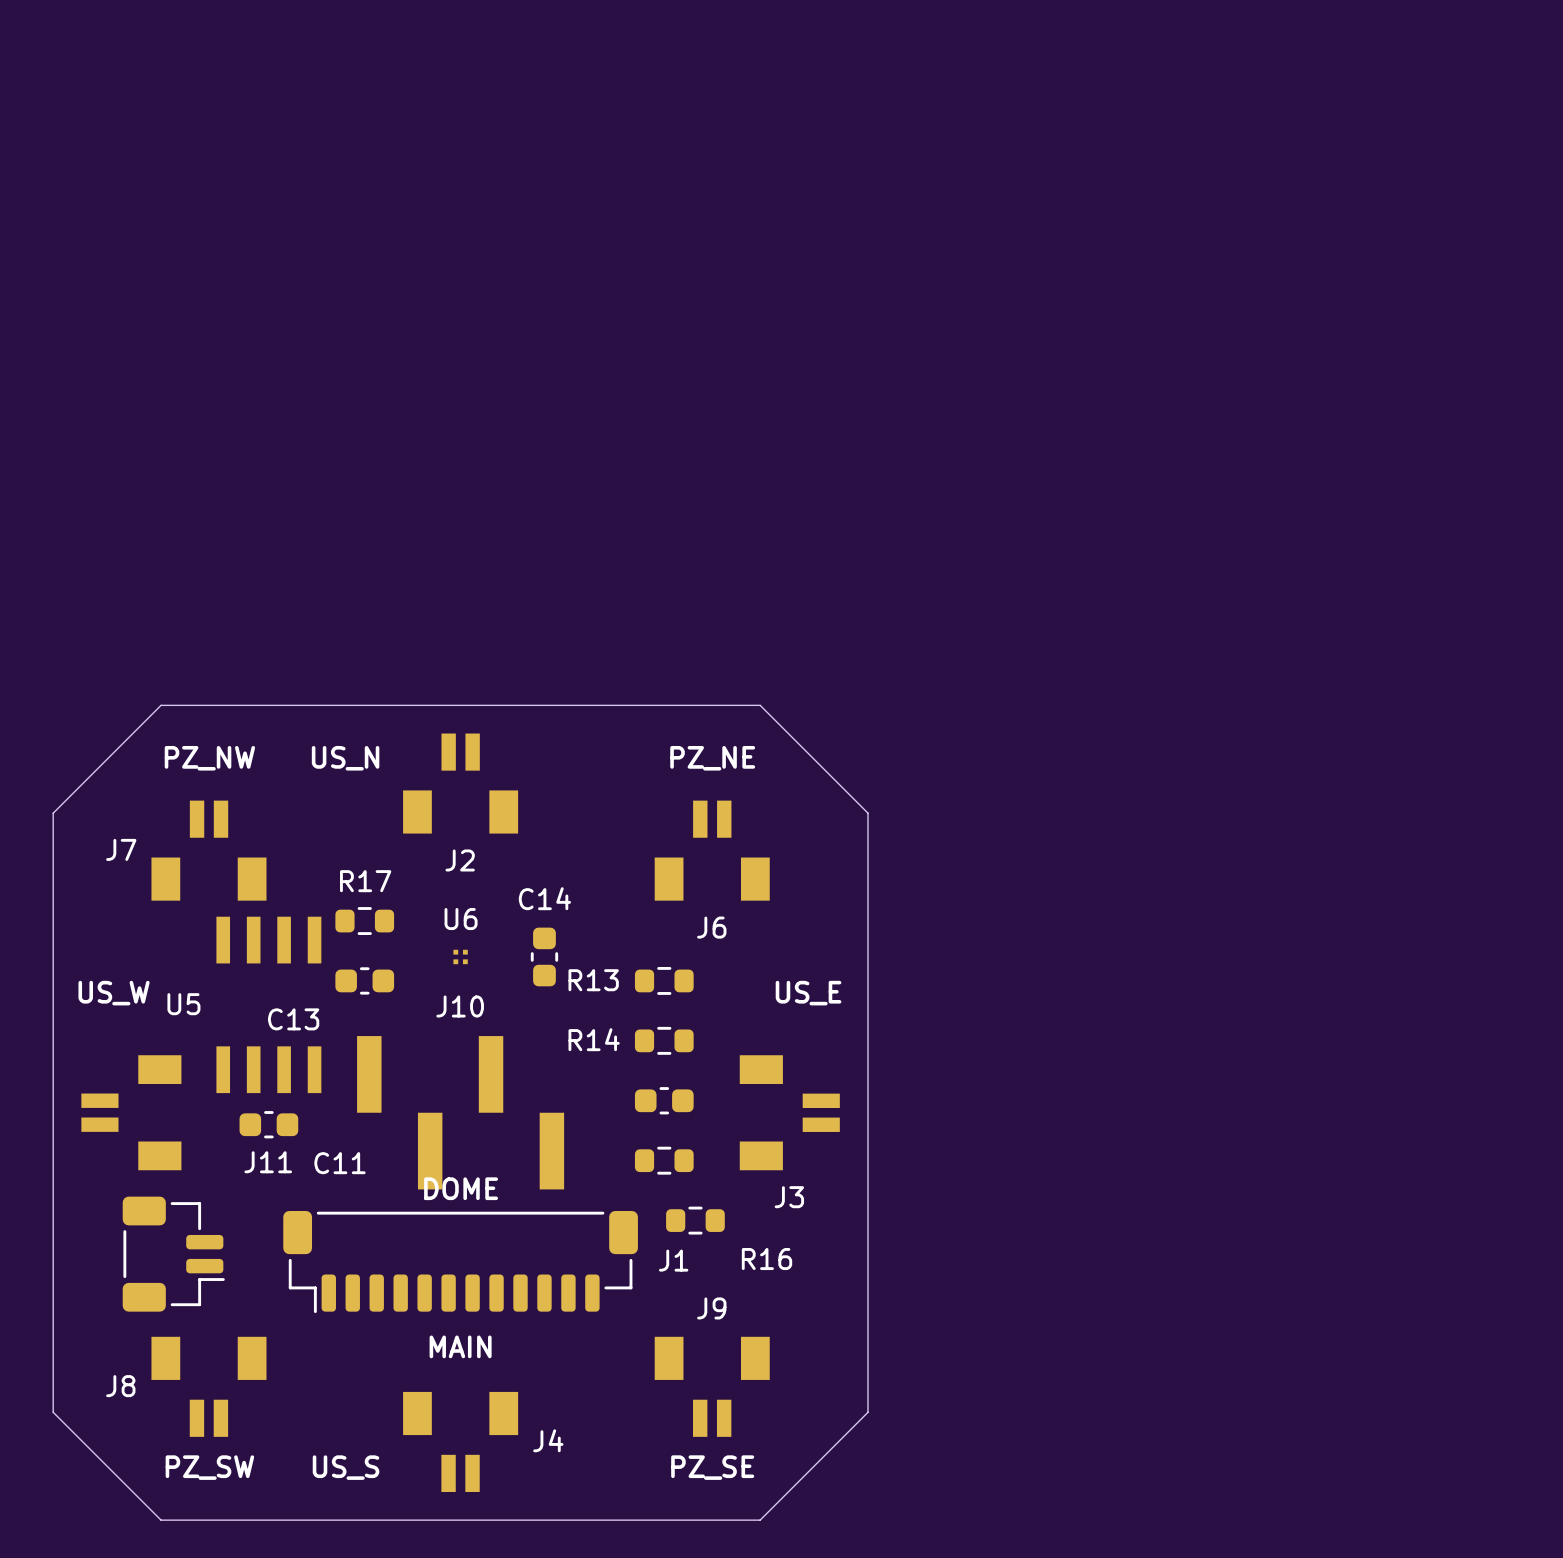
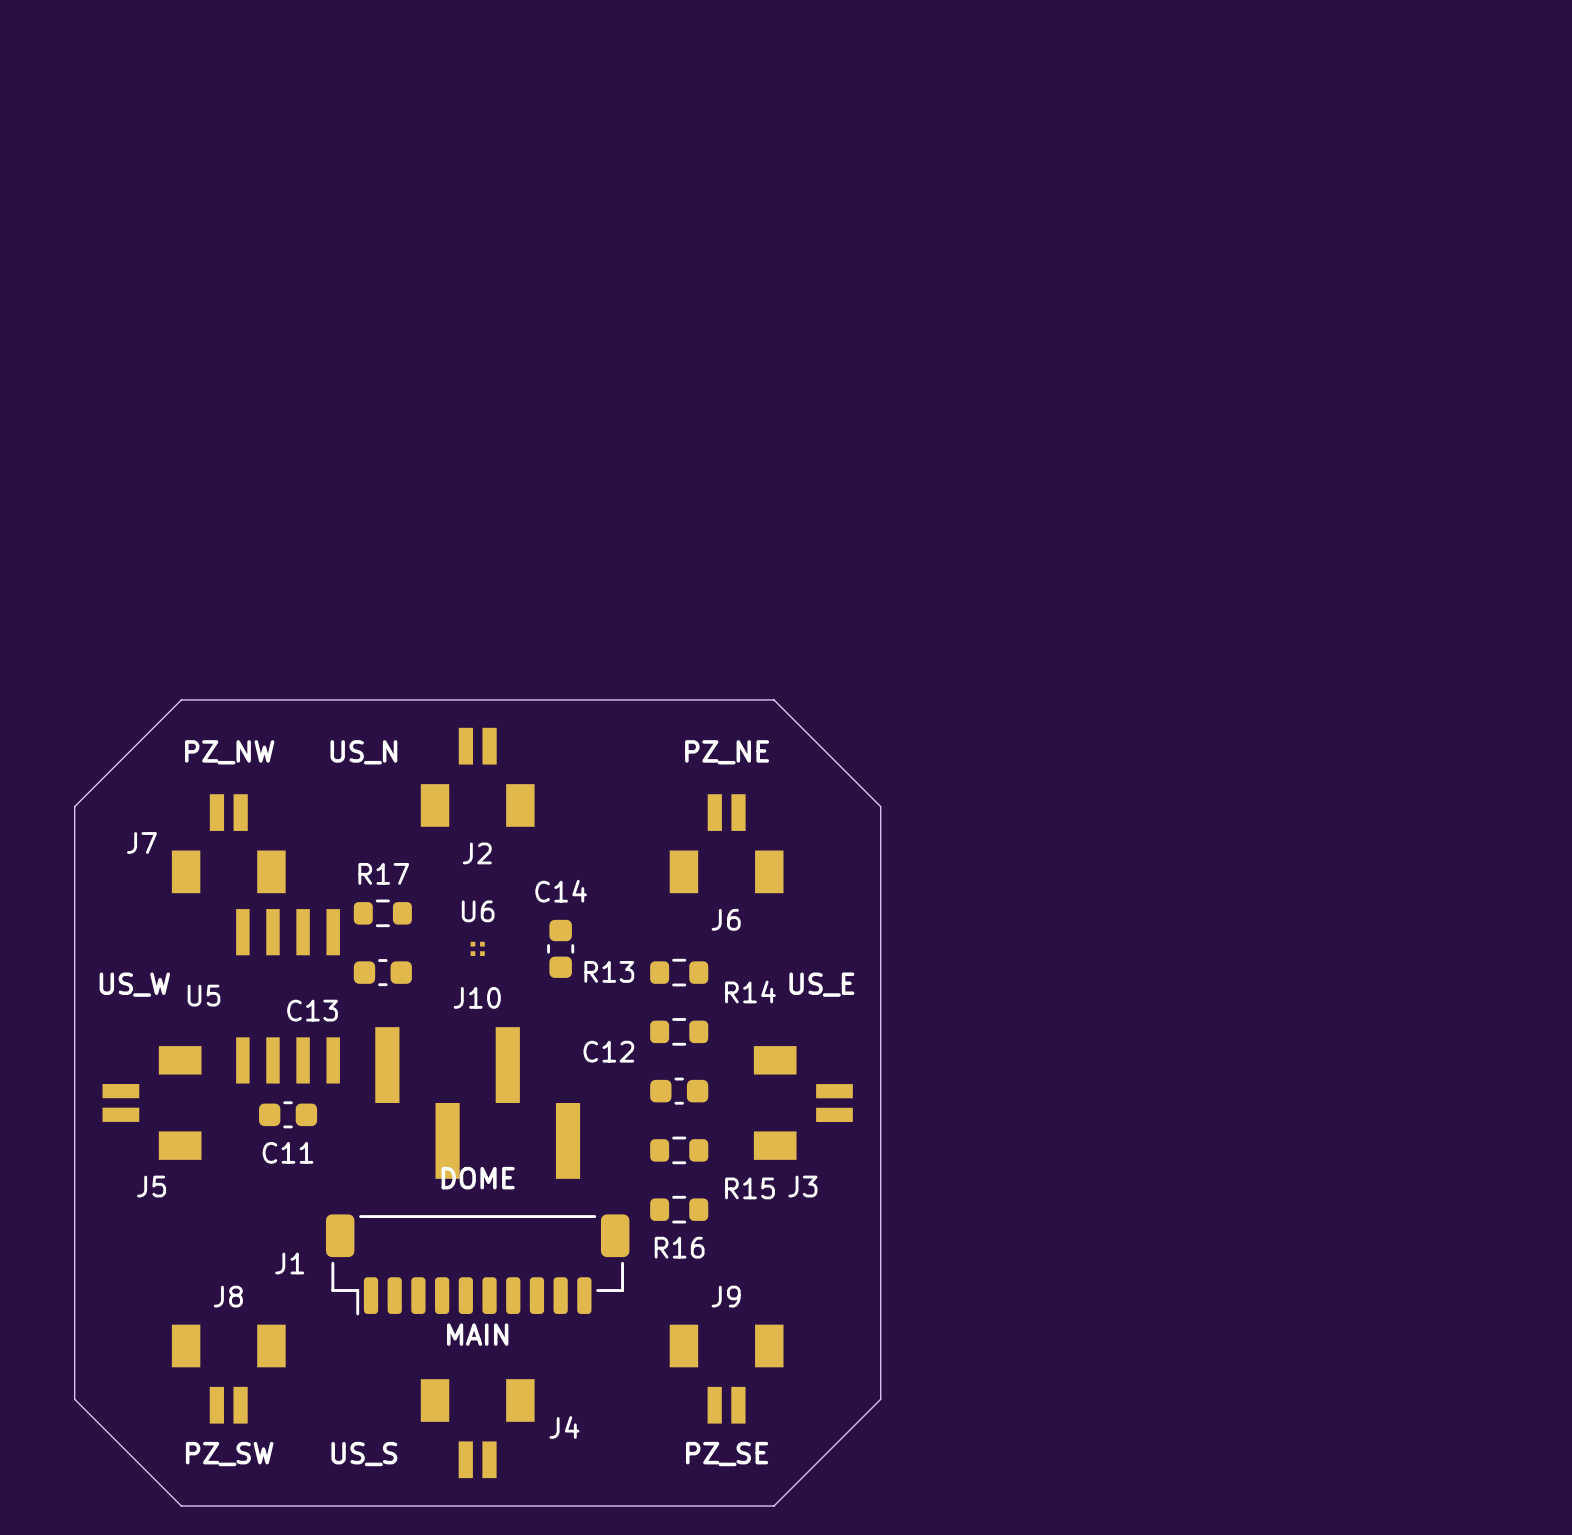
R14 name position: R14 (594, 1039) -> R14 (750, 991)
C12 name: none -> C12 (608, 1051)
C11 name position: C11 (339, 1163) -> C11 (288, 1152)
J5 name: none -> J5 (151, 1186)
R15 name: none -> R15 (749, 1188)
J1 footprint: [283, 1211, 638, 1314] -> [325, 1214, 630, 1316]
R16 position: (695, 1220) -> (679, 1209)
J11: (173, 1254) -> none
R16 name position: R16 (767, 1259) -> R16 (679, 1247)
J1 name position: J1 (673, 1260) -> J1 (289, 1263)
J8 name position: J8 (120, 1386) -> J8 (228, 1296)

